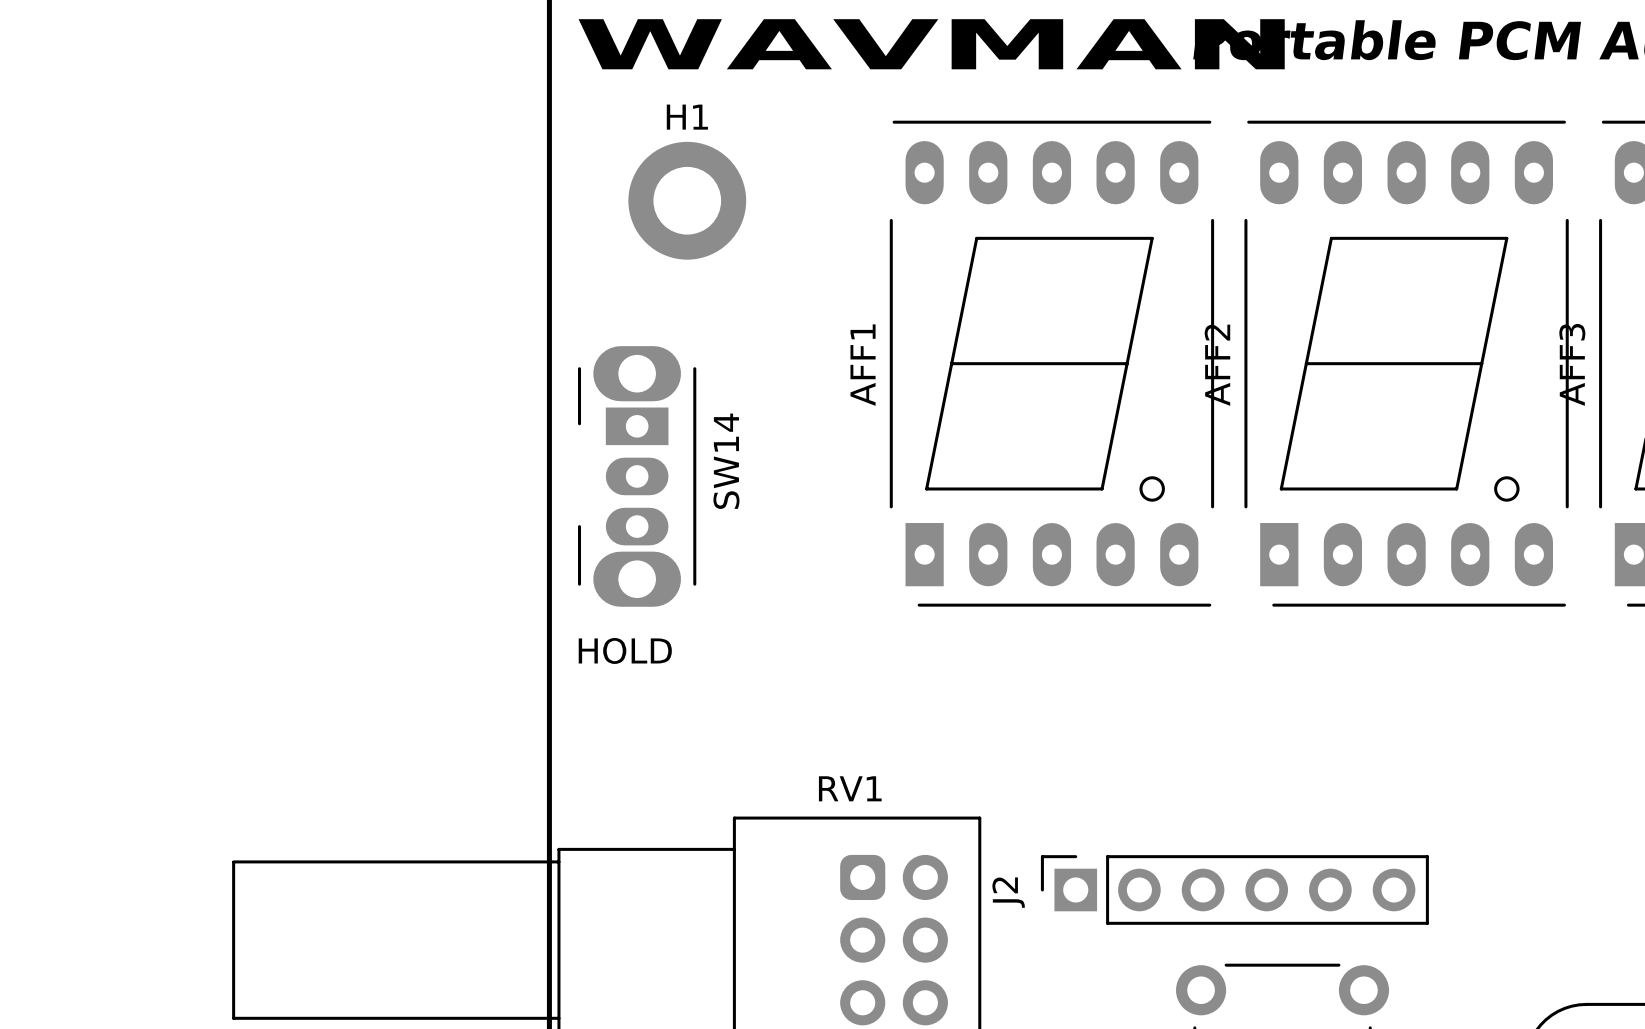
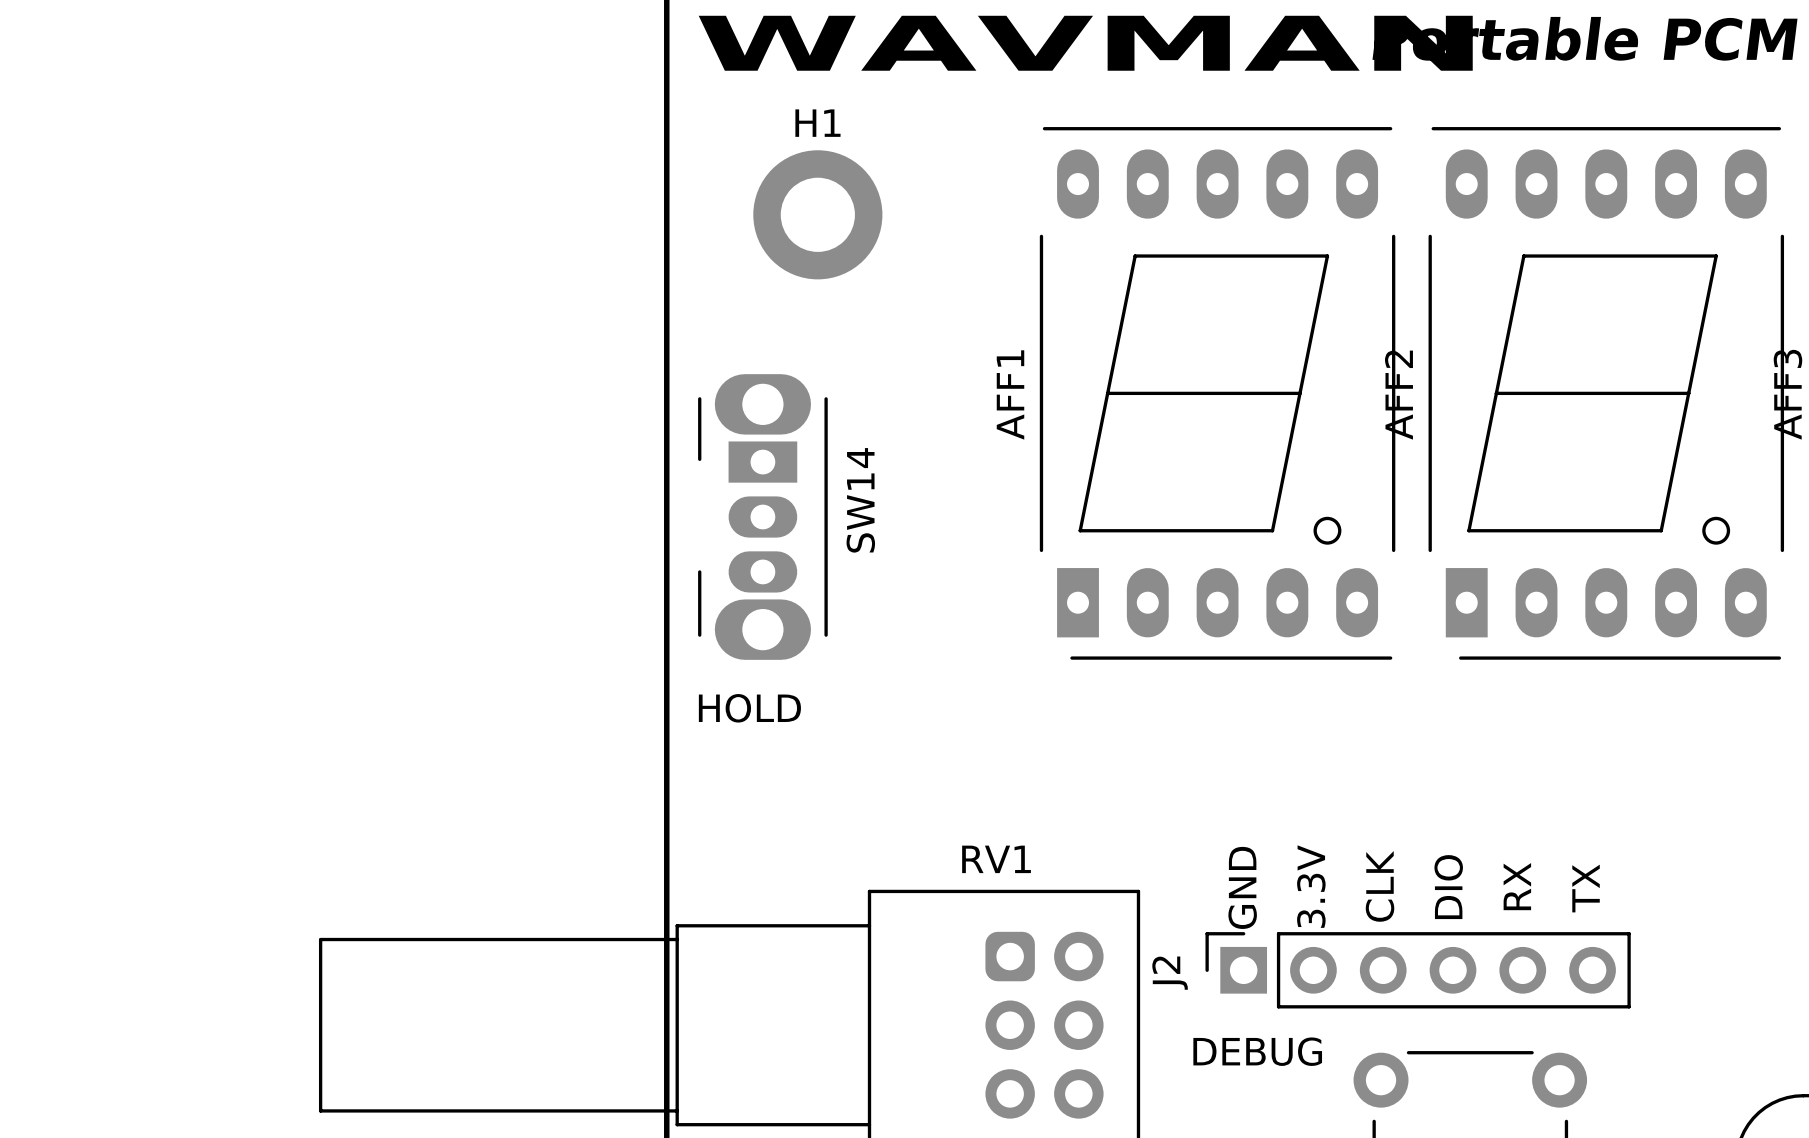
text: none -> 3.3V (1311, 886)
text: none -> CLK (1380, 886)
text: none -> RX (1517, 886)
text: none -> GND (1242, 887)
text: none -> DIO (1448, 887)
text: none -> TX (1586, 888)
J2 value: none -> DEBUG (1257, 1051)

